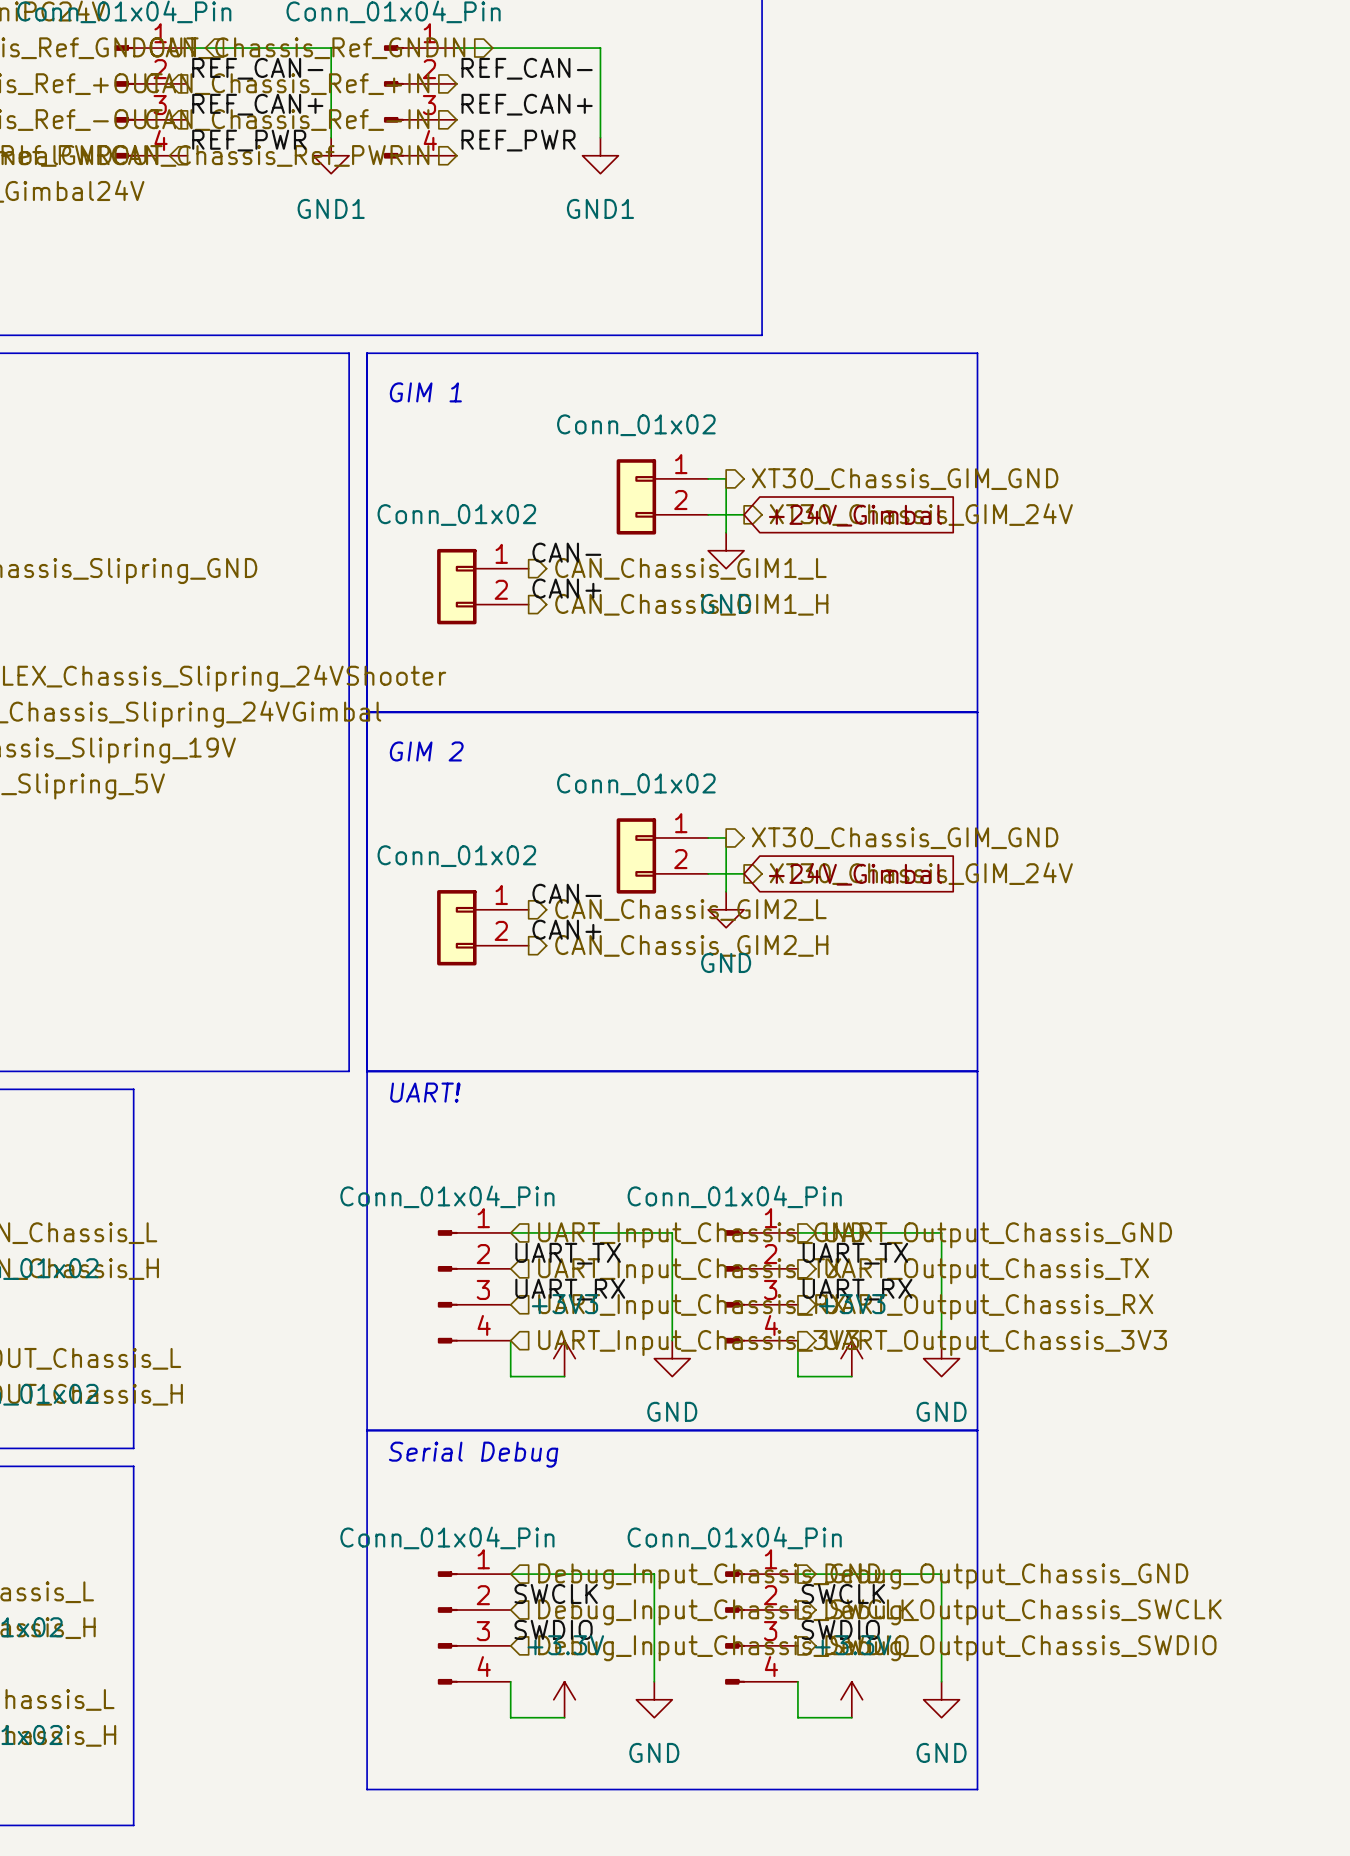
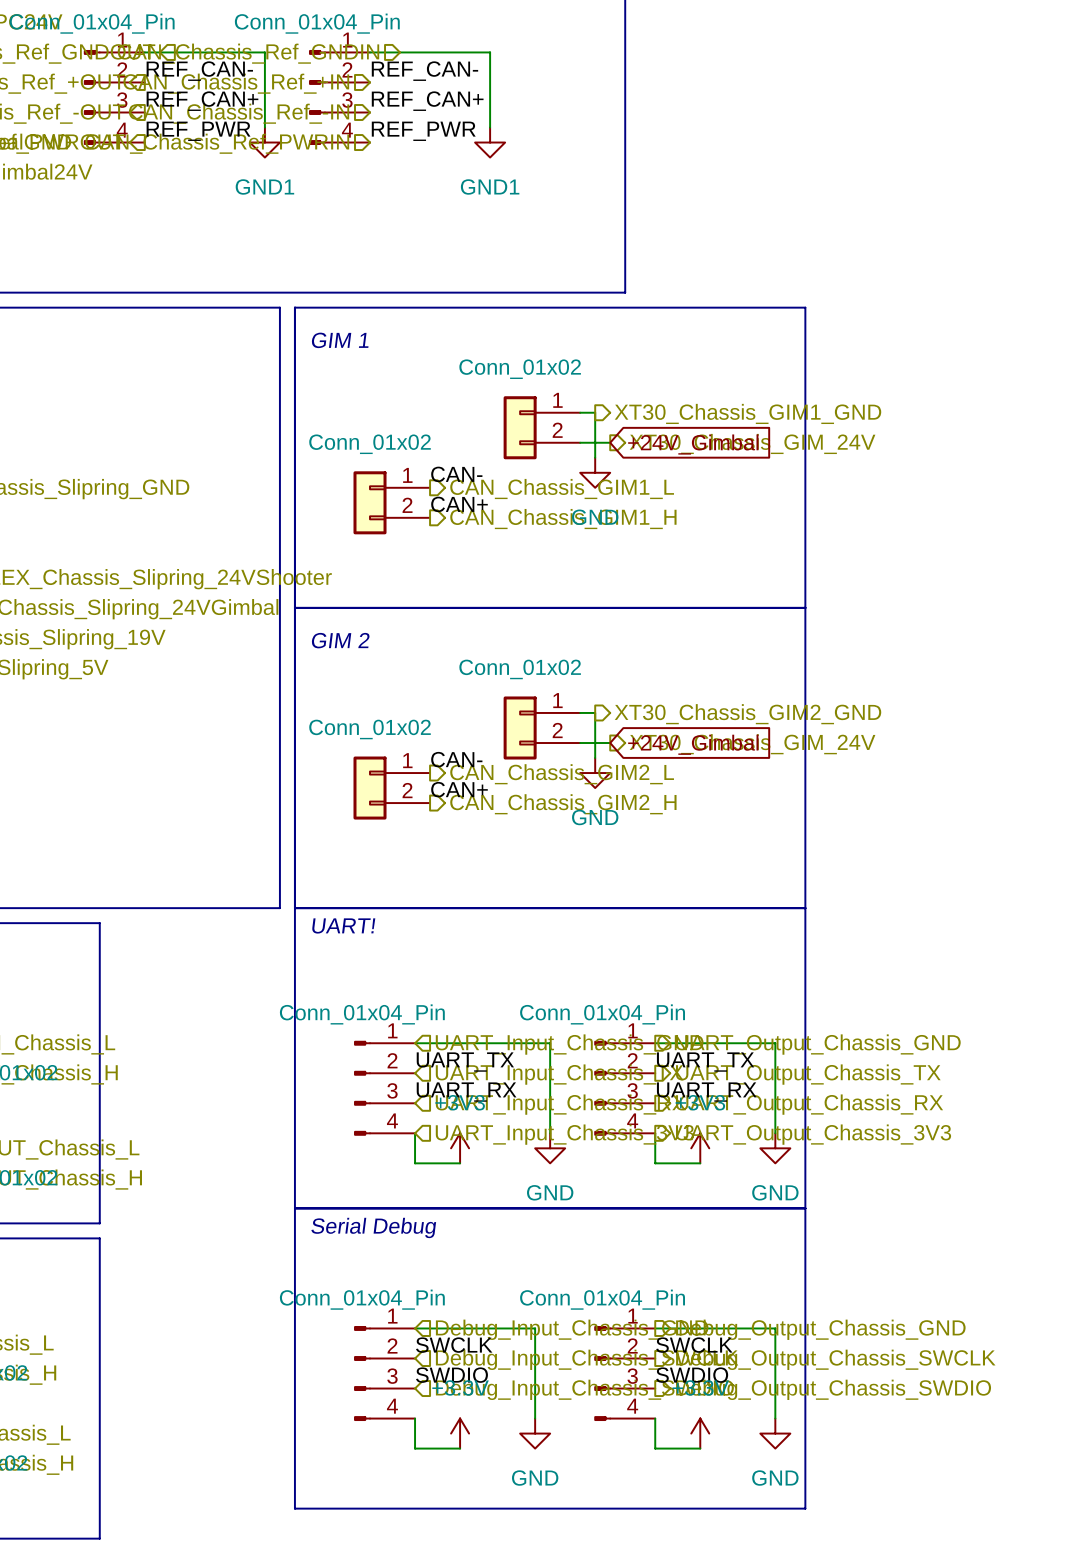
hierarchical label: XT30_Chassis_GIM_GND (905, 479) -> XT30_Chassis_GIM1_GND (747, 413)
hierarchical label: XT30_Chassis_GIM_GND (905, 838) -> XT30_Chassis_GIM2_GND (747, 714)

